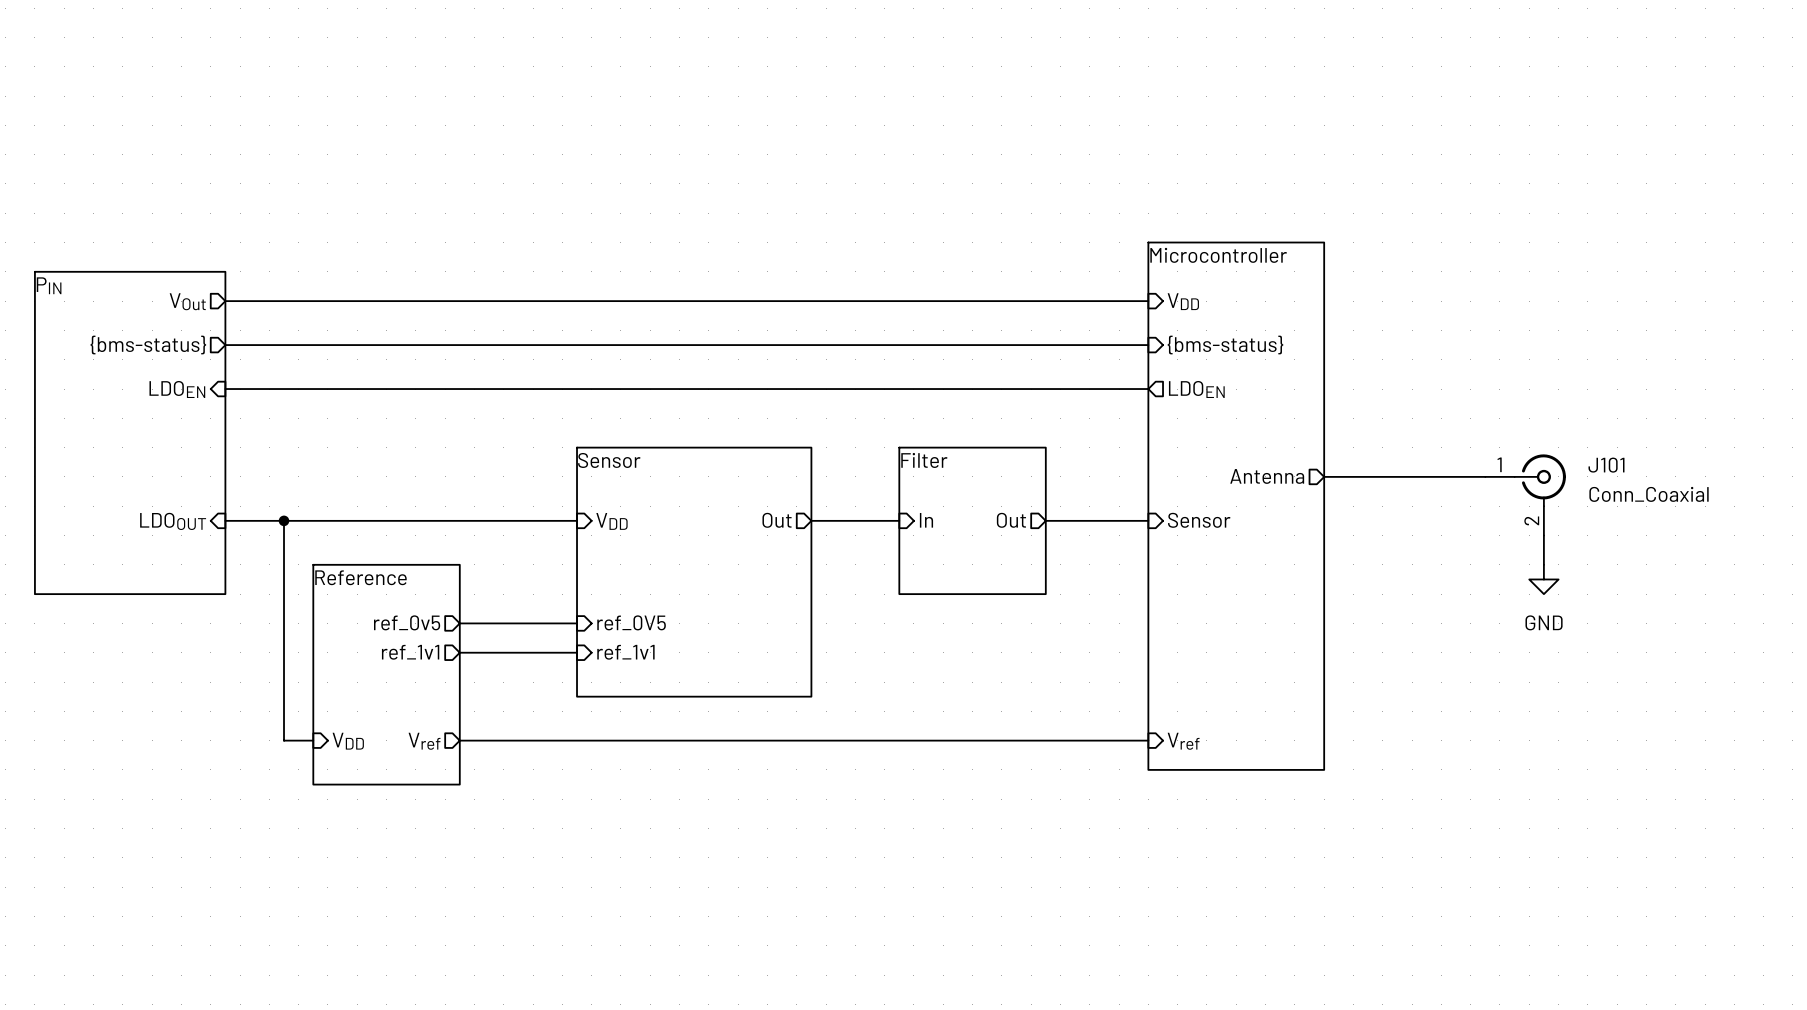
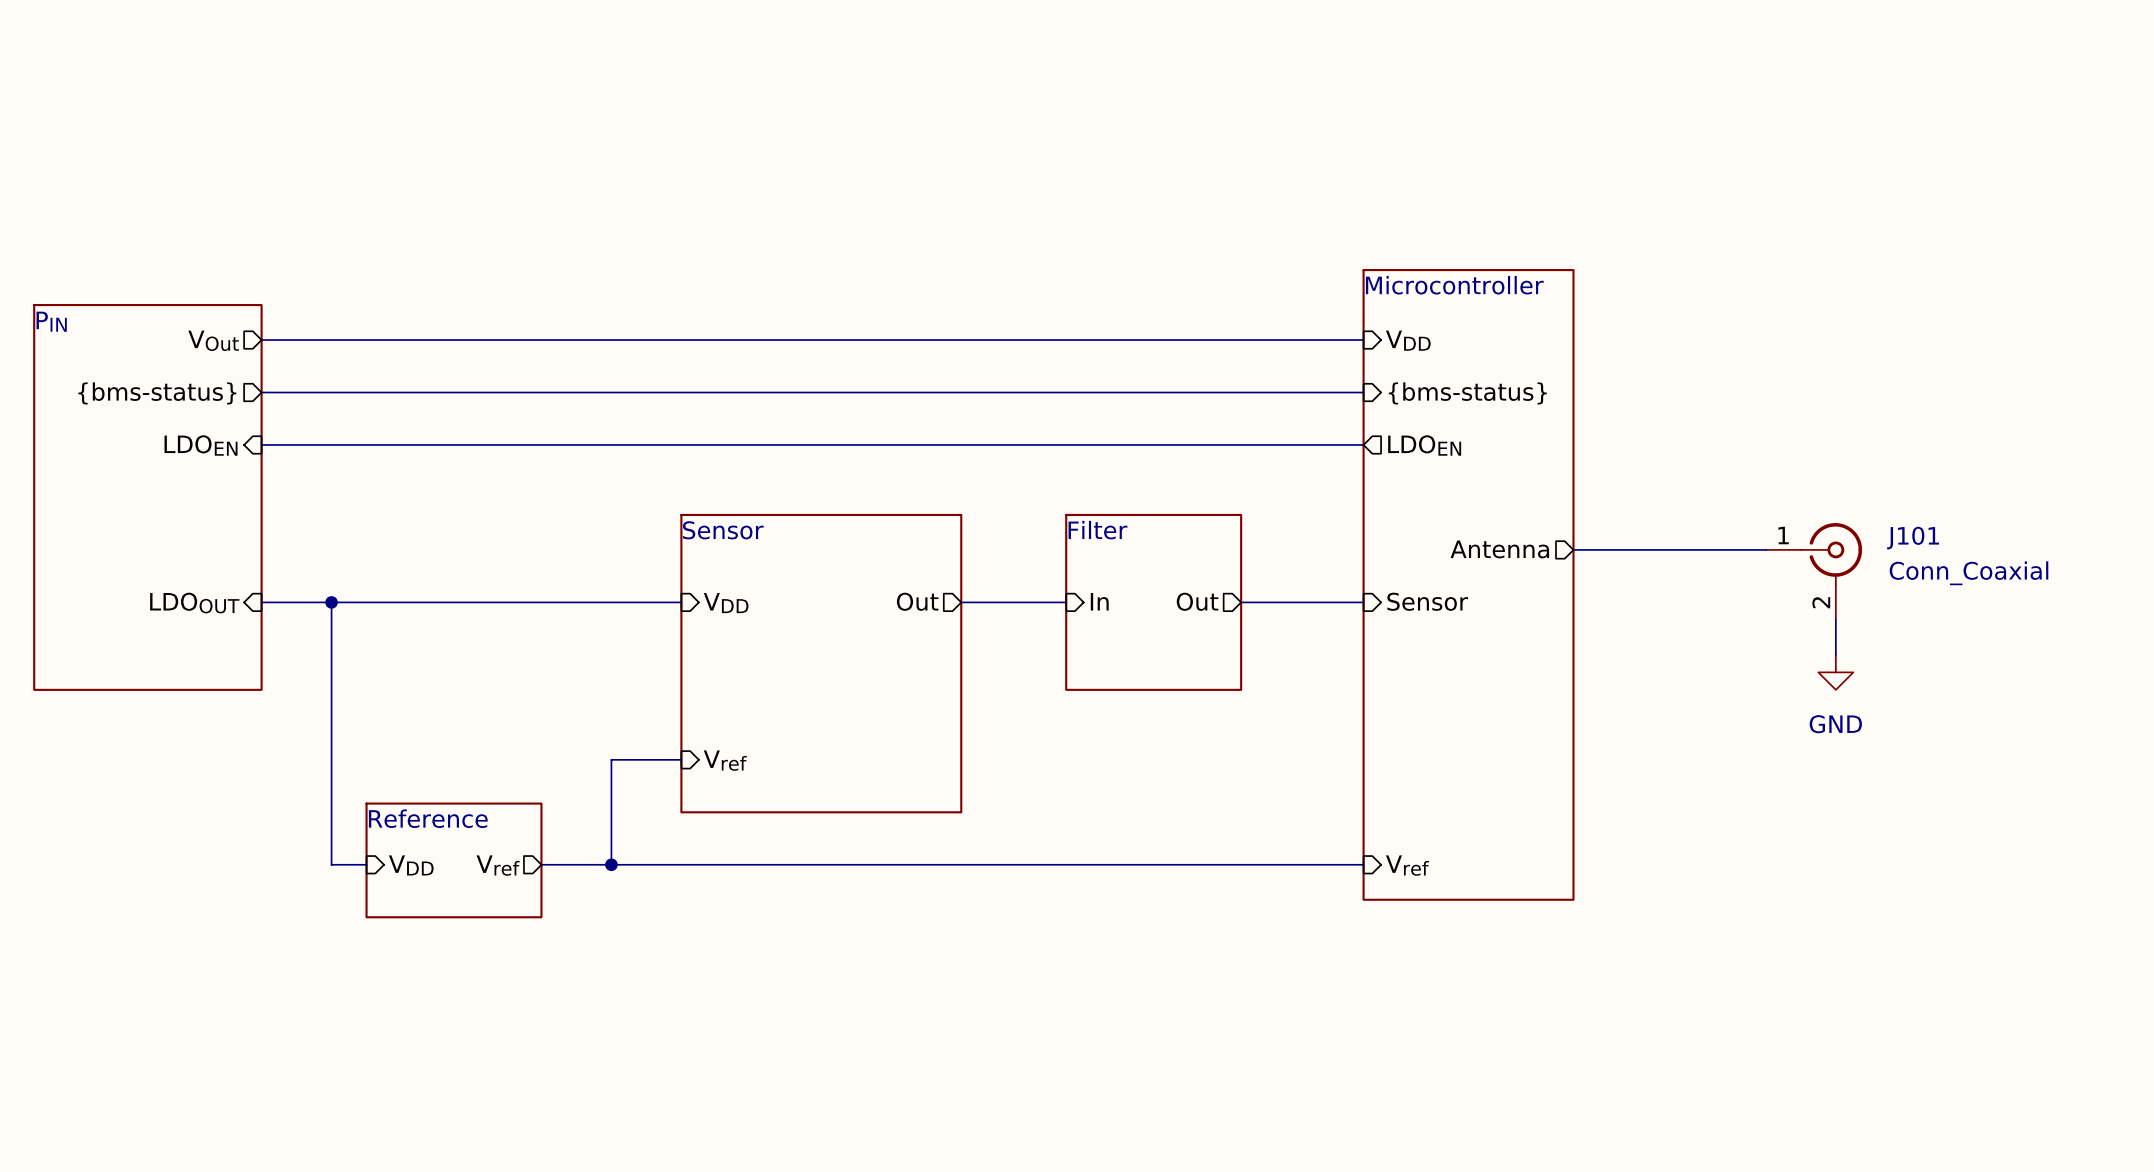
sheet pin: ref_0v5 (407, 622) -> none
sheet pin: ref_0V5 (631, 622) -> none
wire: (459, 623) (577, 623) -> none
sheet pin: ref_1v1 (410, 652) -> none
wire: (459, 652) (518, 652) -> (611, 864) (611, 759)
sheet pin: ref_1v1 (625, 652) -> Vref (725, 760)
sheet Reference: (386, 674) -> none
sheet Reference: none -> (454, 860)
junction: none -> (611, 864)

